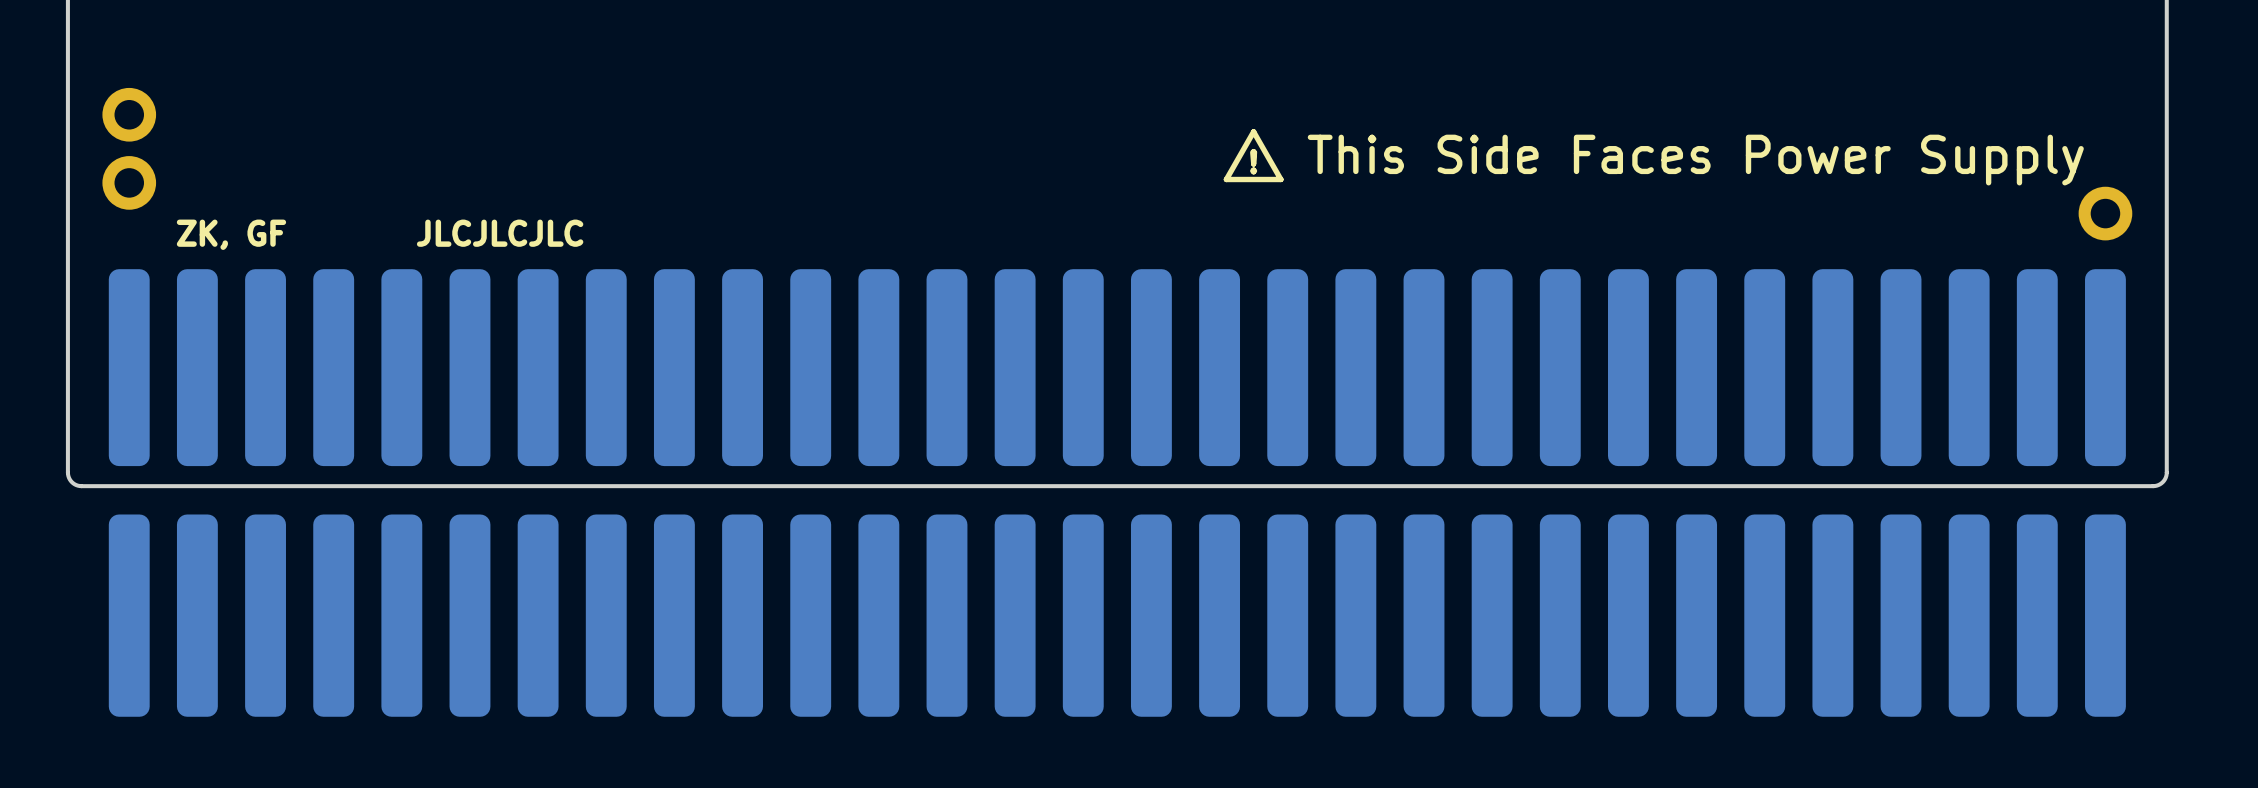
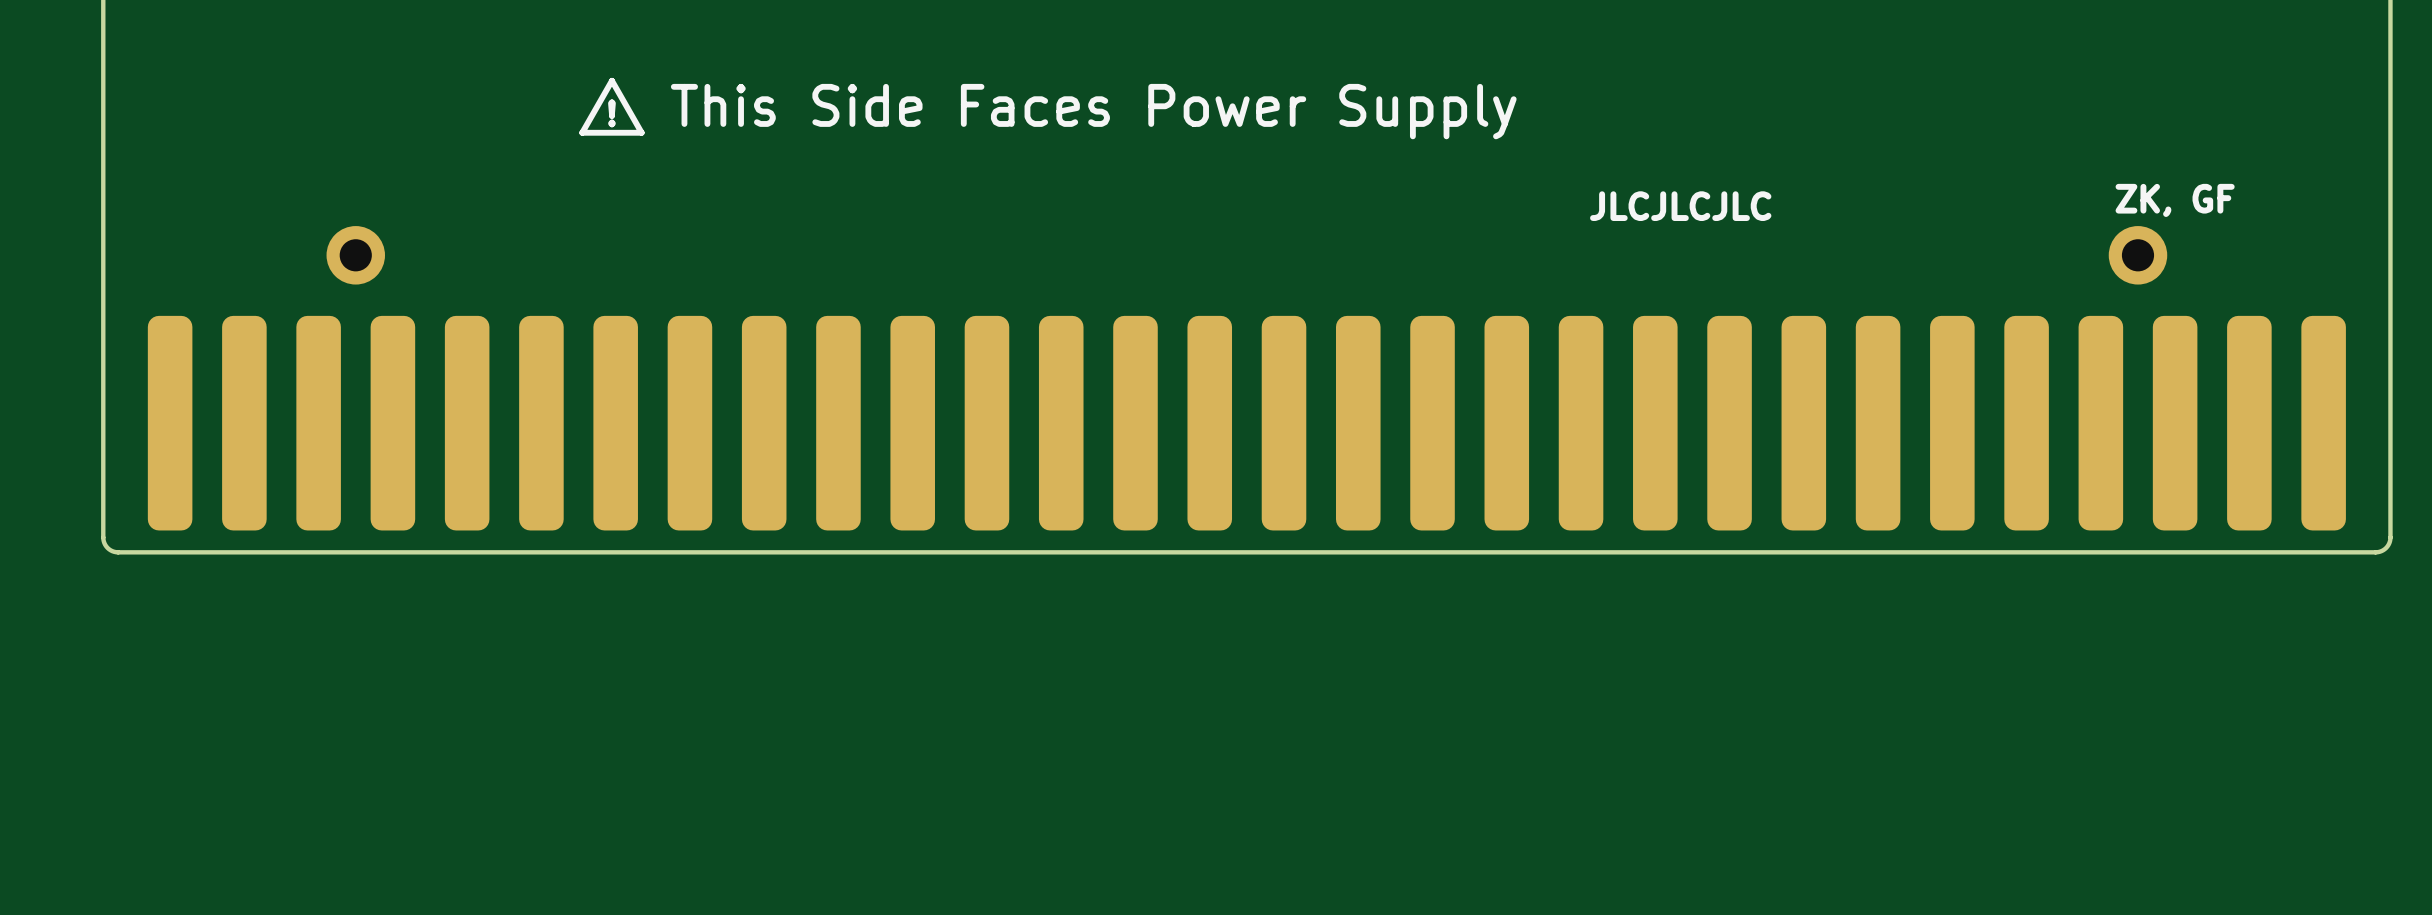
line: none -> (611, 80) (582, 132) (641, 132) (611, 80)
text: none -> This Side Faces Power Supply (1093, 111)
text: none -> ! (611, 113)
part: (129, 114) -> none
line: (1253, 131) (1226, 179) (1280, 179) (1253, 131) -> none
text: This Side Faces Power Supply (1695, 160) -> none
text: ! (1253, 161) -> none
text: none -> ZK, GF (2175, 200)
text: none -> JLCJLCJLC (1680, 206)
part: (129, 182) -> none
part: none -> (355, 255)
part position: (2105, 213) -> (2137, 255)
text: JLCJLCJLC (500, 233) -> none
text: ZK, GF (231, 234) -> none
part: (1117, 615) -> none

